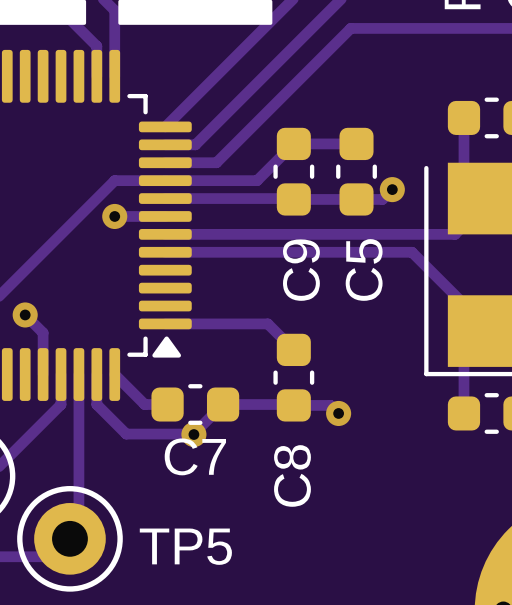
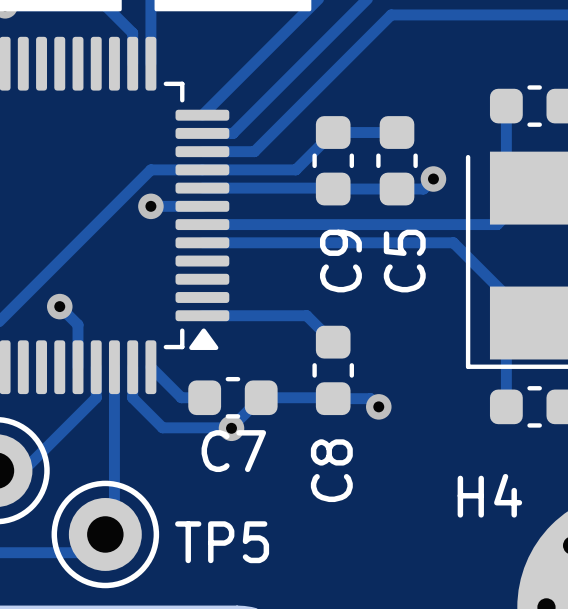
H4 name: none -> H4 (489, 495)

